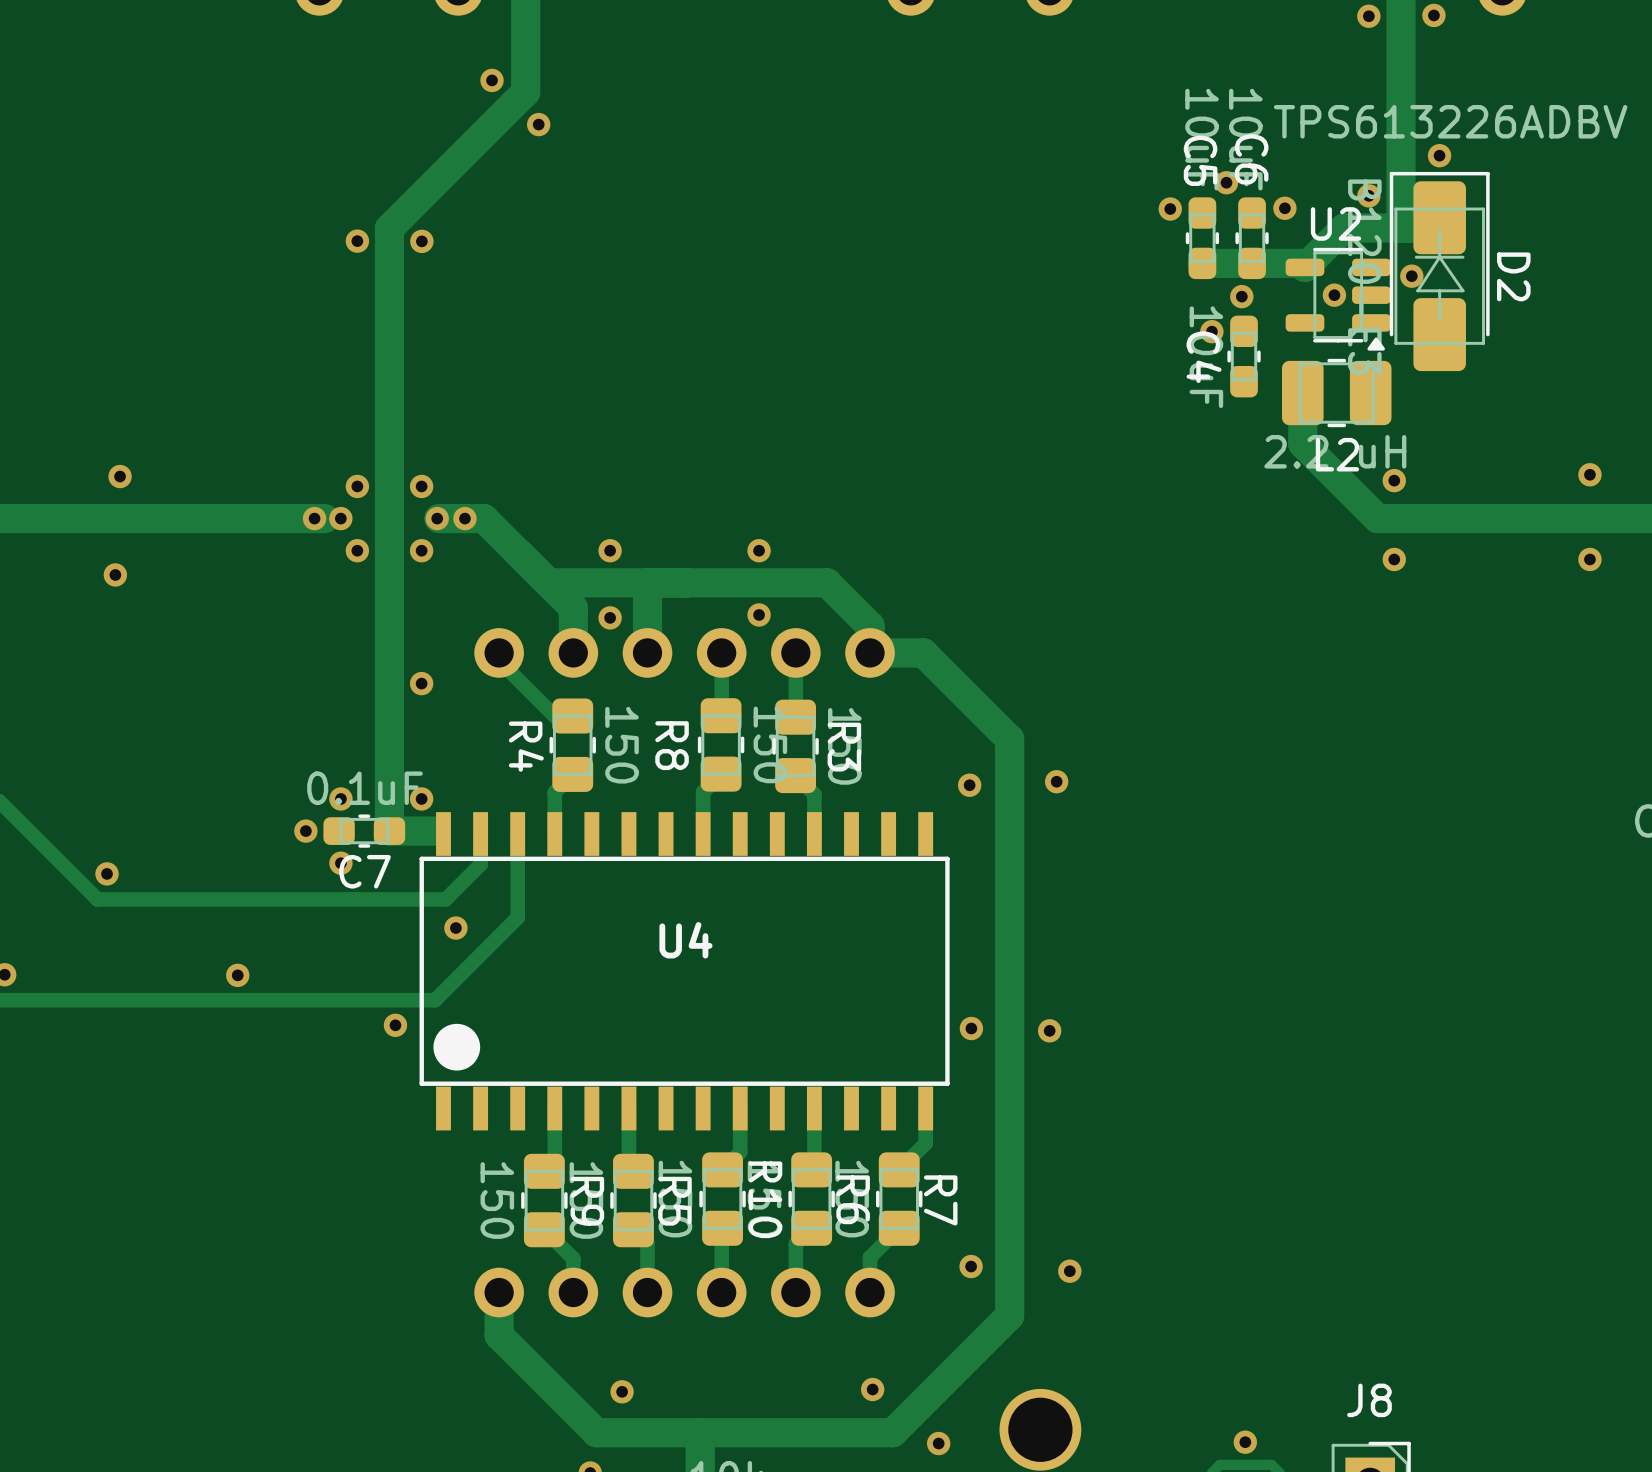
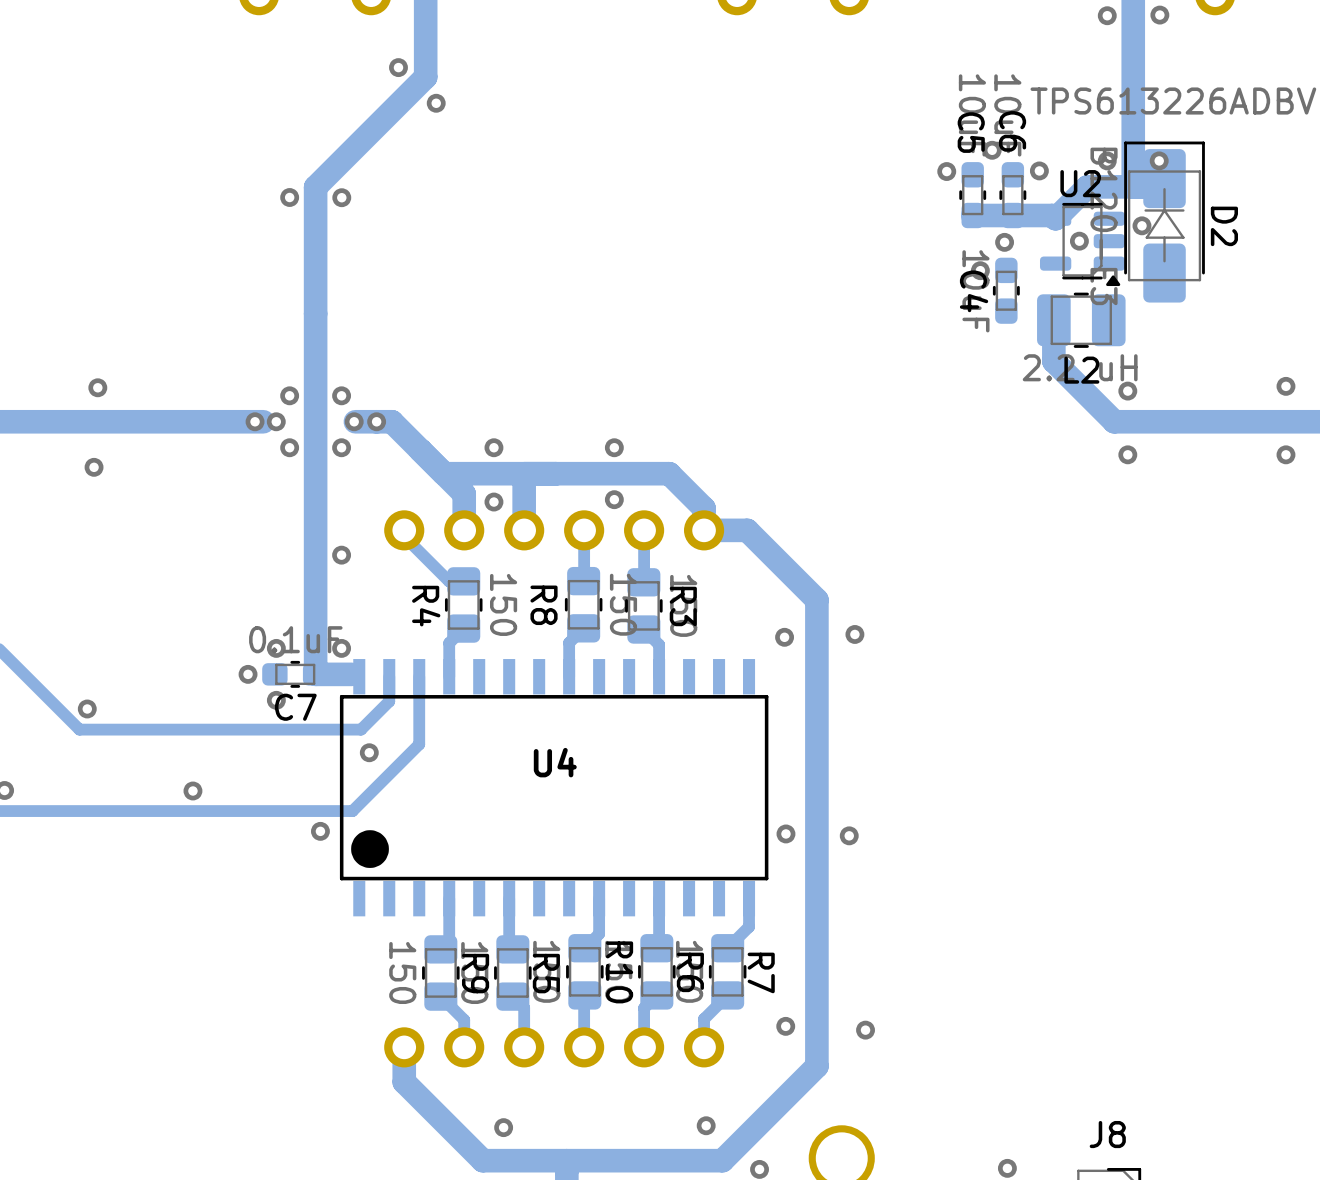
via position: (1439, 155) -> (1159, 160)

